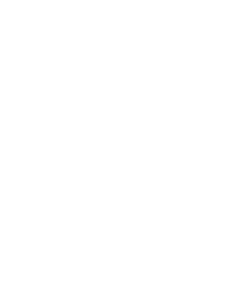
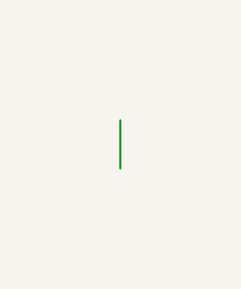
wire: none -> (120, 120) (120, 168)

